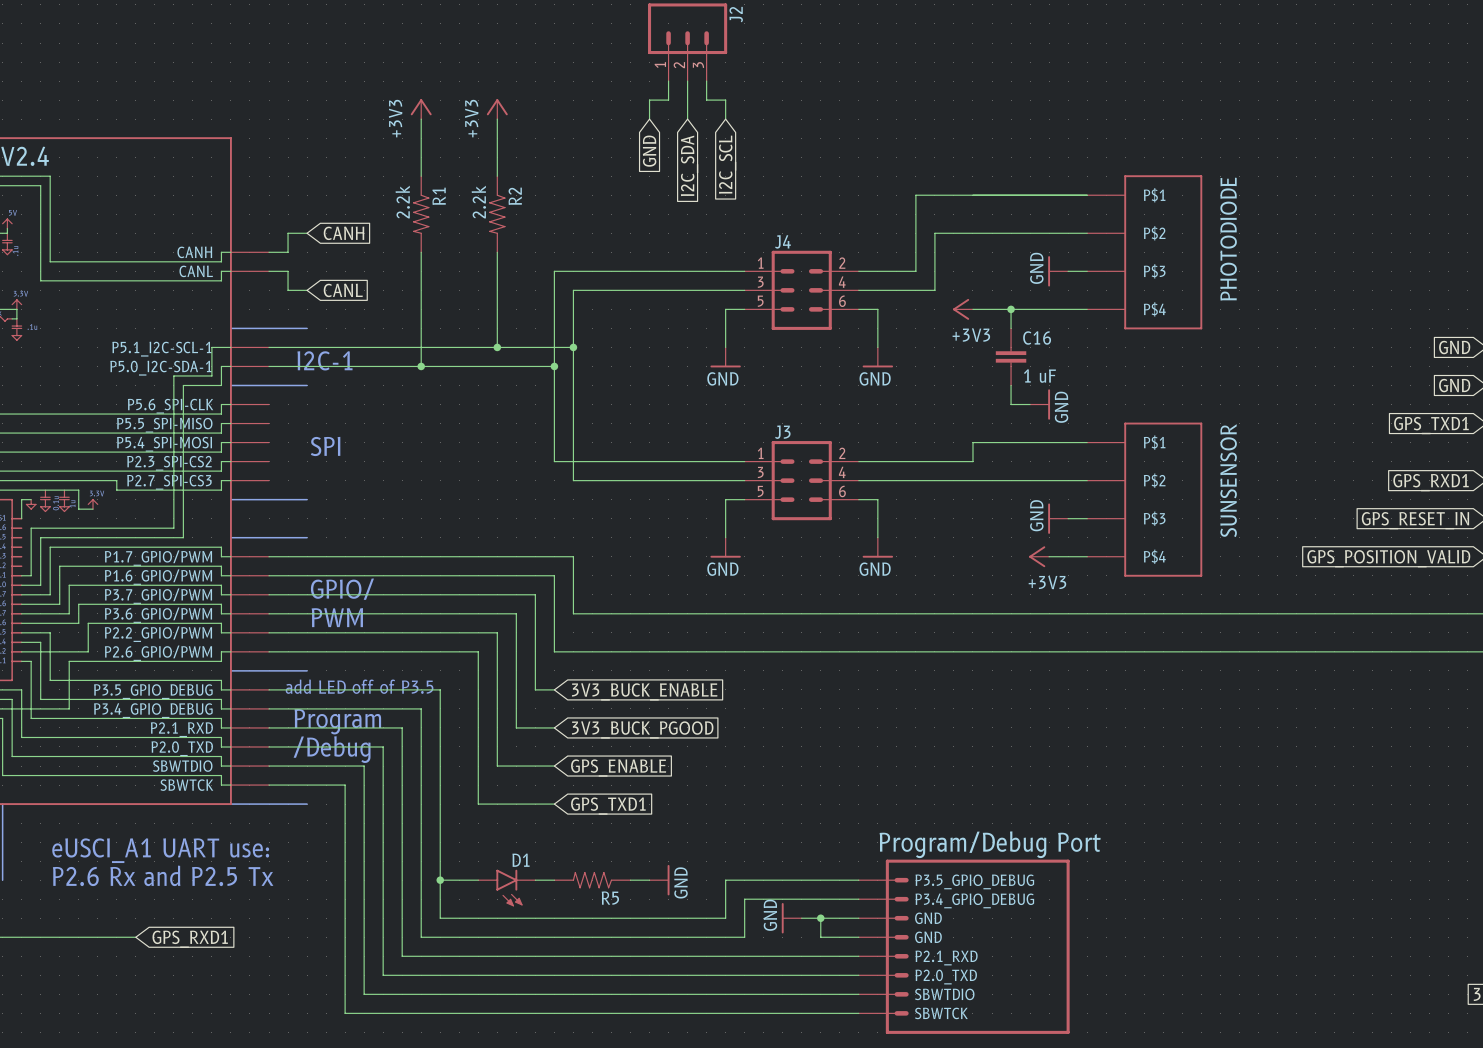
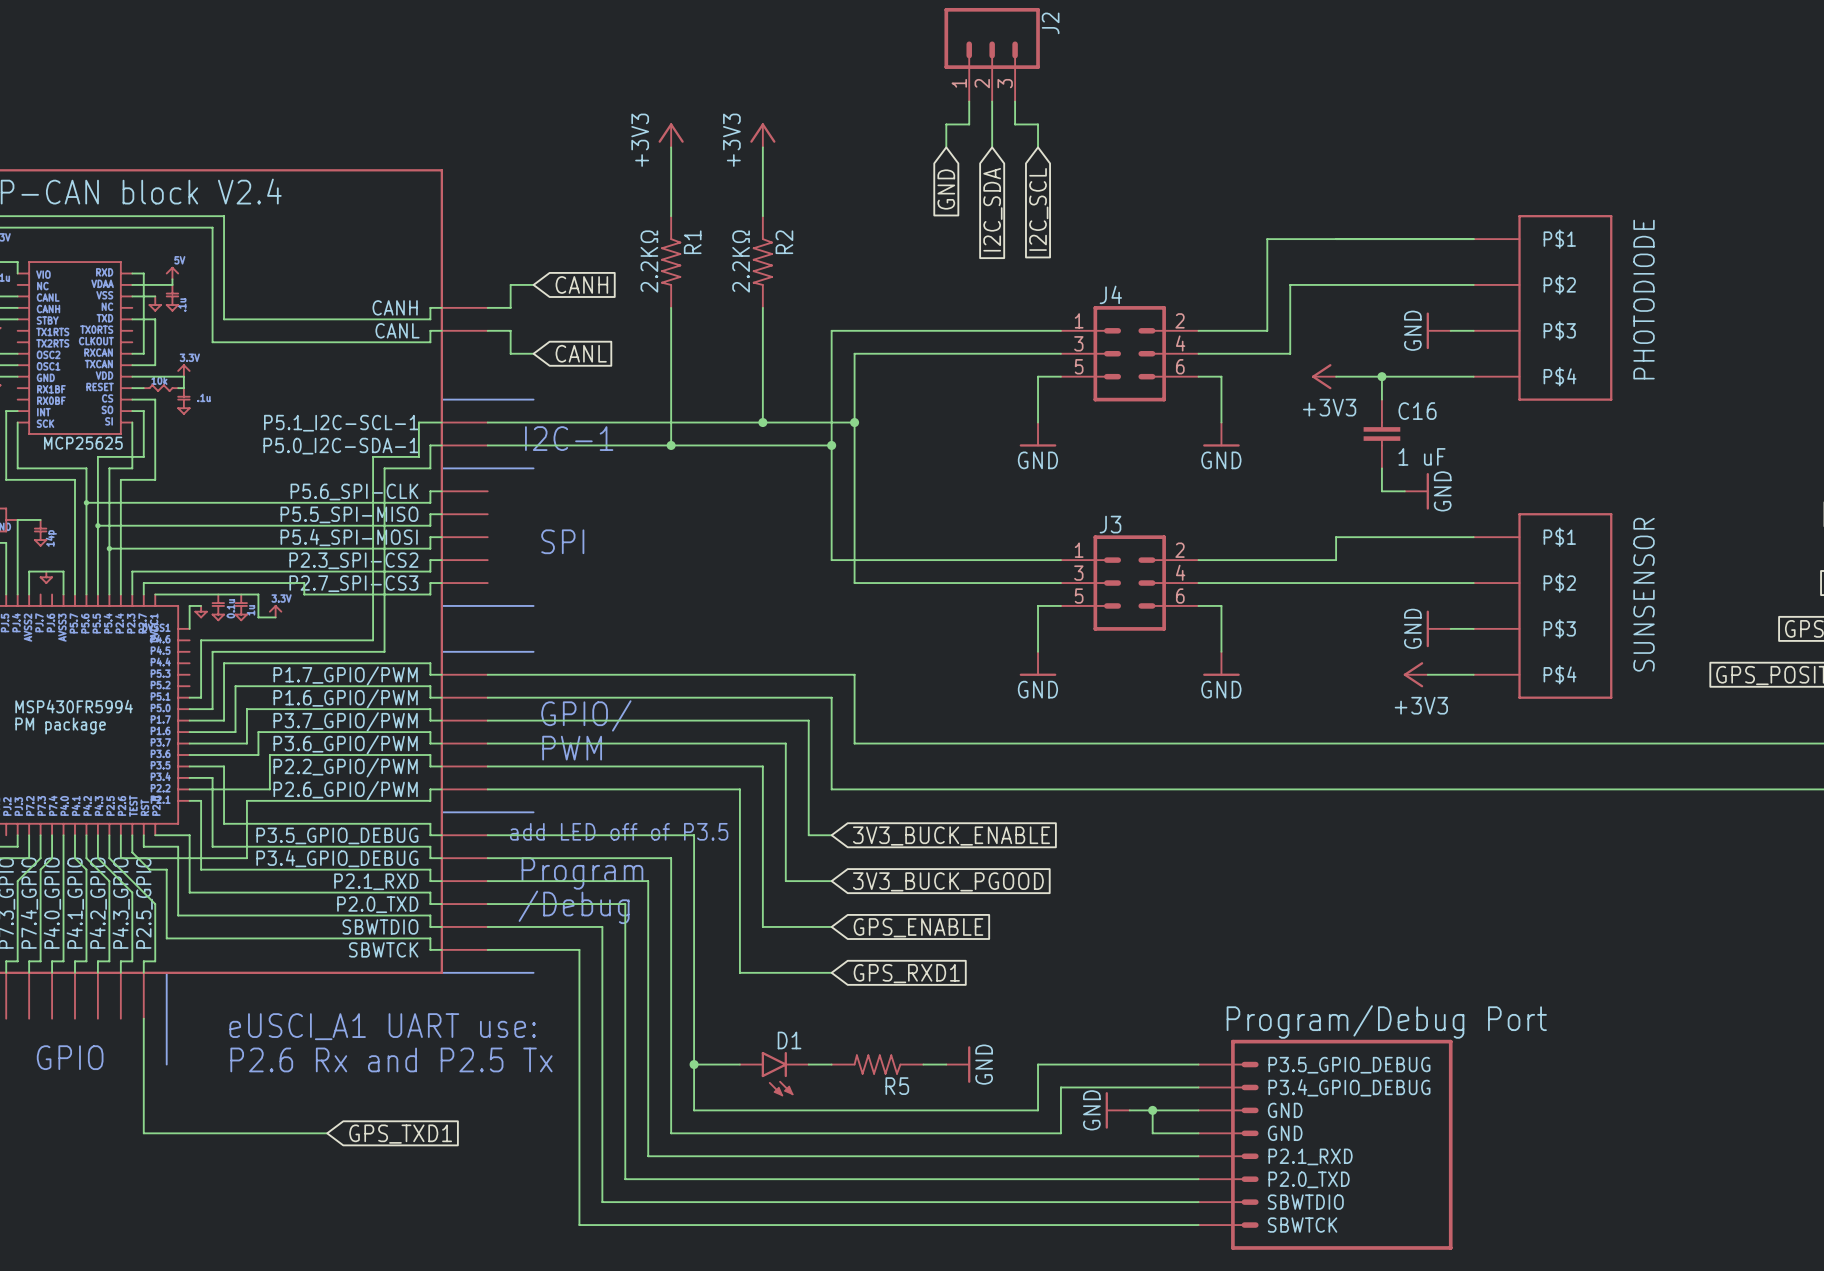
R1 value: 2.2k (402, 202) -> 2.2KΩ (649, 261)
R2 value: 2.2k (478, 202) -> 2.2KΩ (741, 261)
global label: GPS_TXD1 (608, 806) -> GPS_RXD1 (906, 973)
global label: GPS_RXD1 (190, 939) -> GPS_TXD1 (400, 1134)

